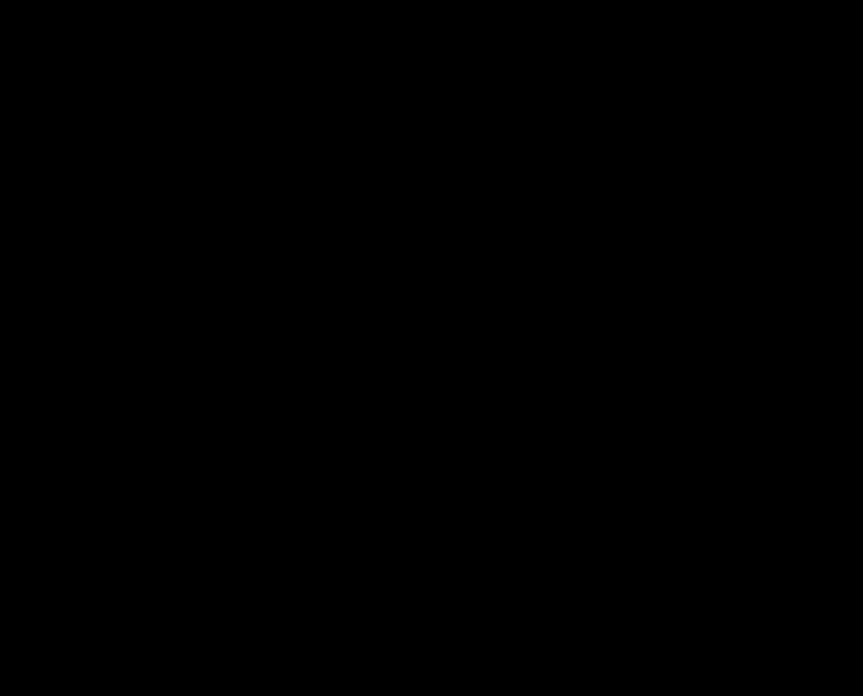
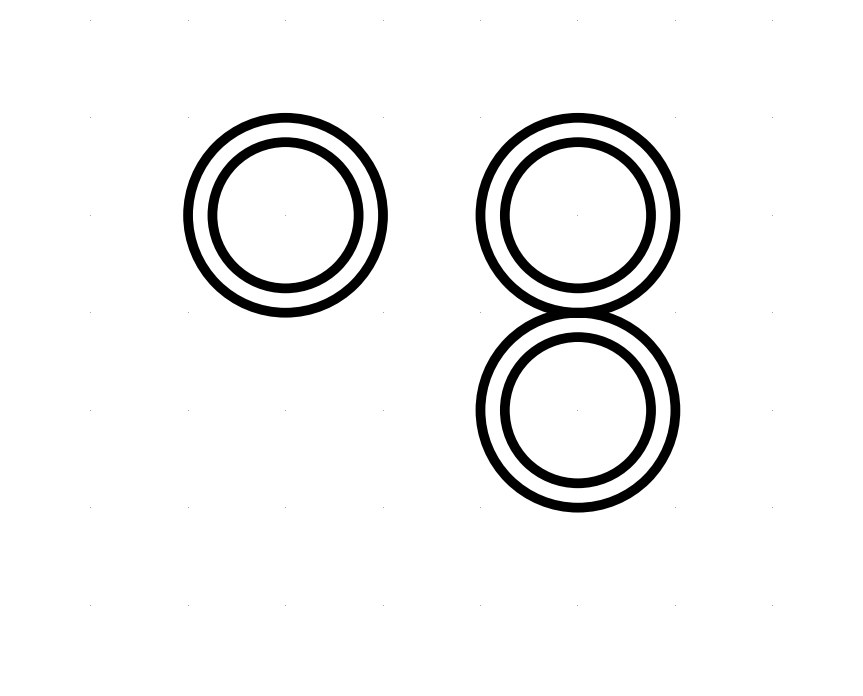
part: none -> (285, 215)
part: none -> (577, 215)
part: none -> (577, 410)

